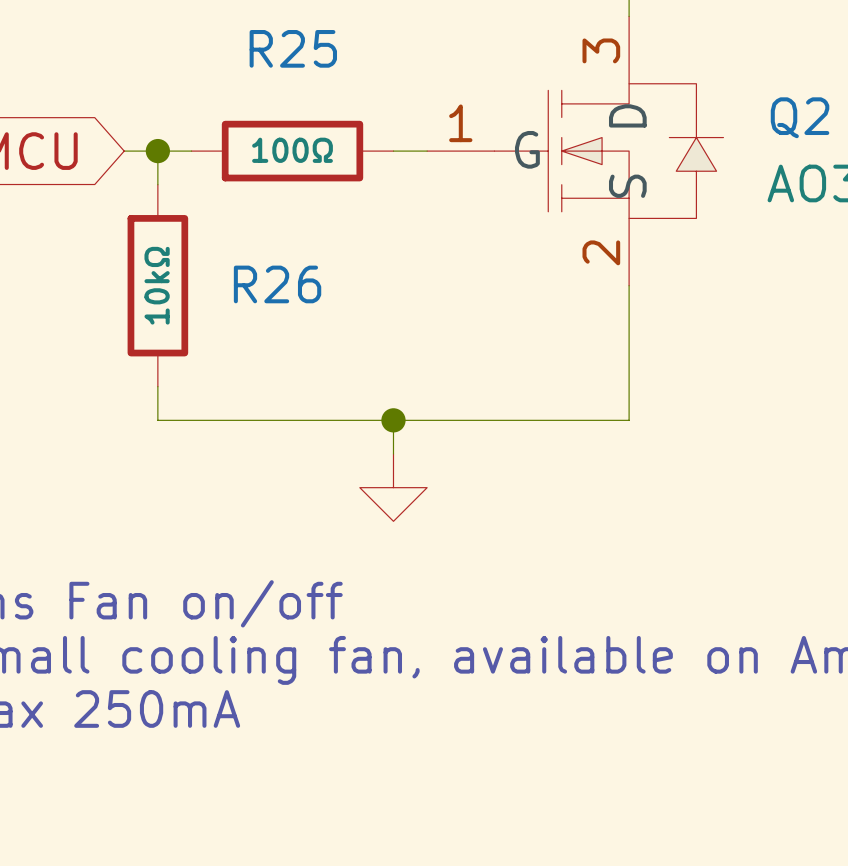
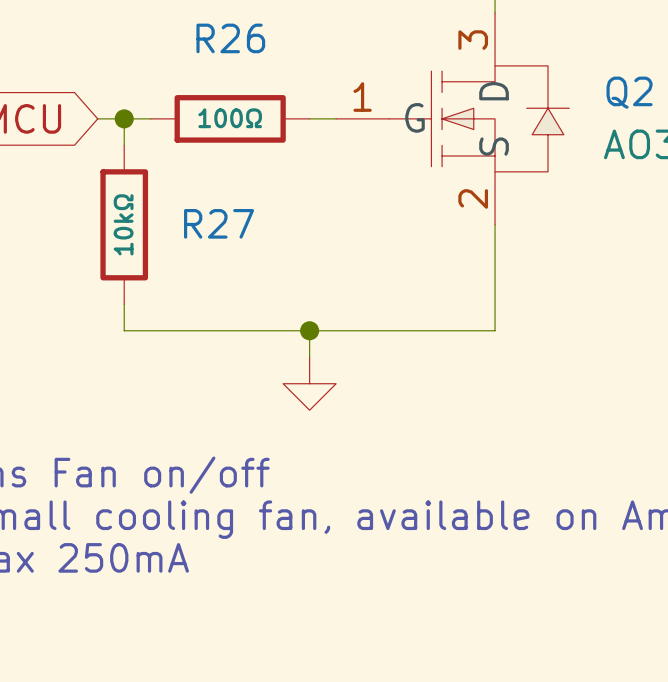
R25 name: R25 (293, 48) -> R26 (230, 38)
R26 name: R26 (277, 284) -> R27 (219, 223)

